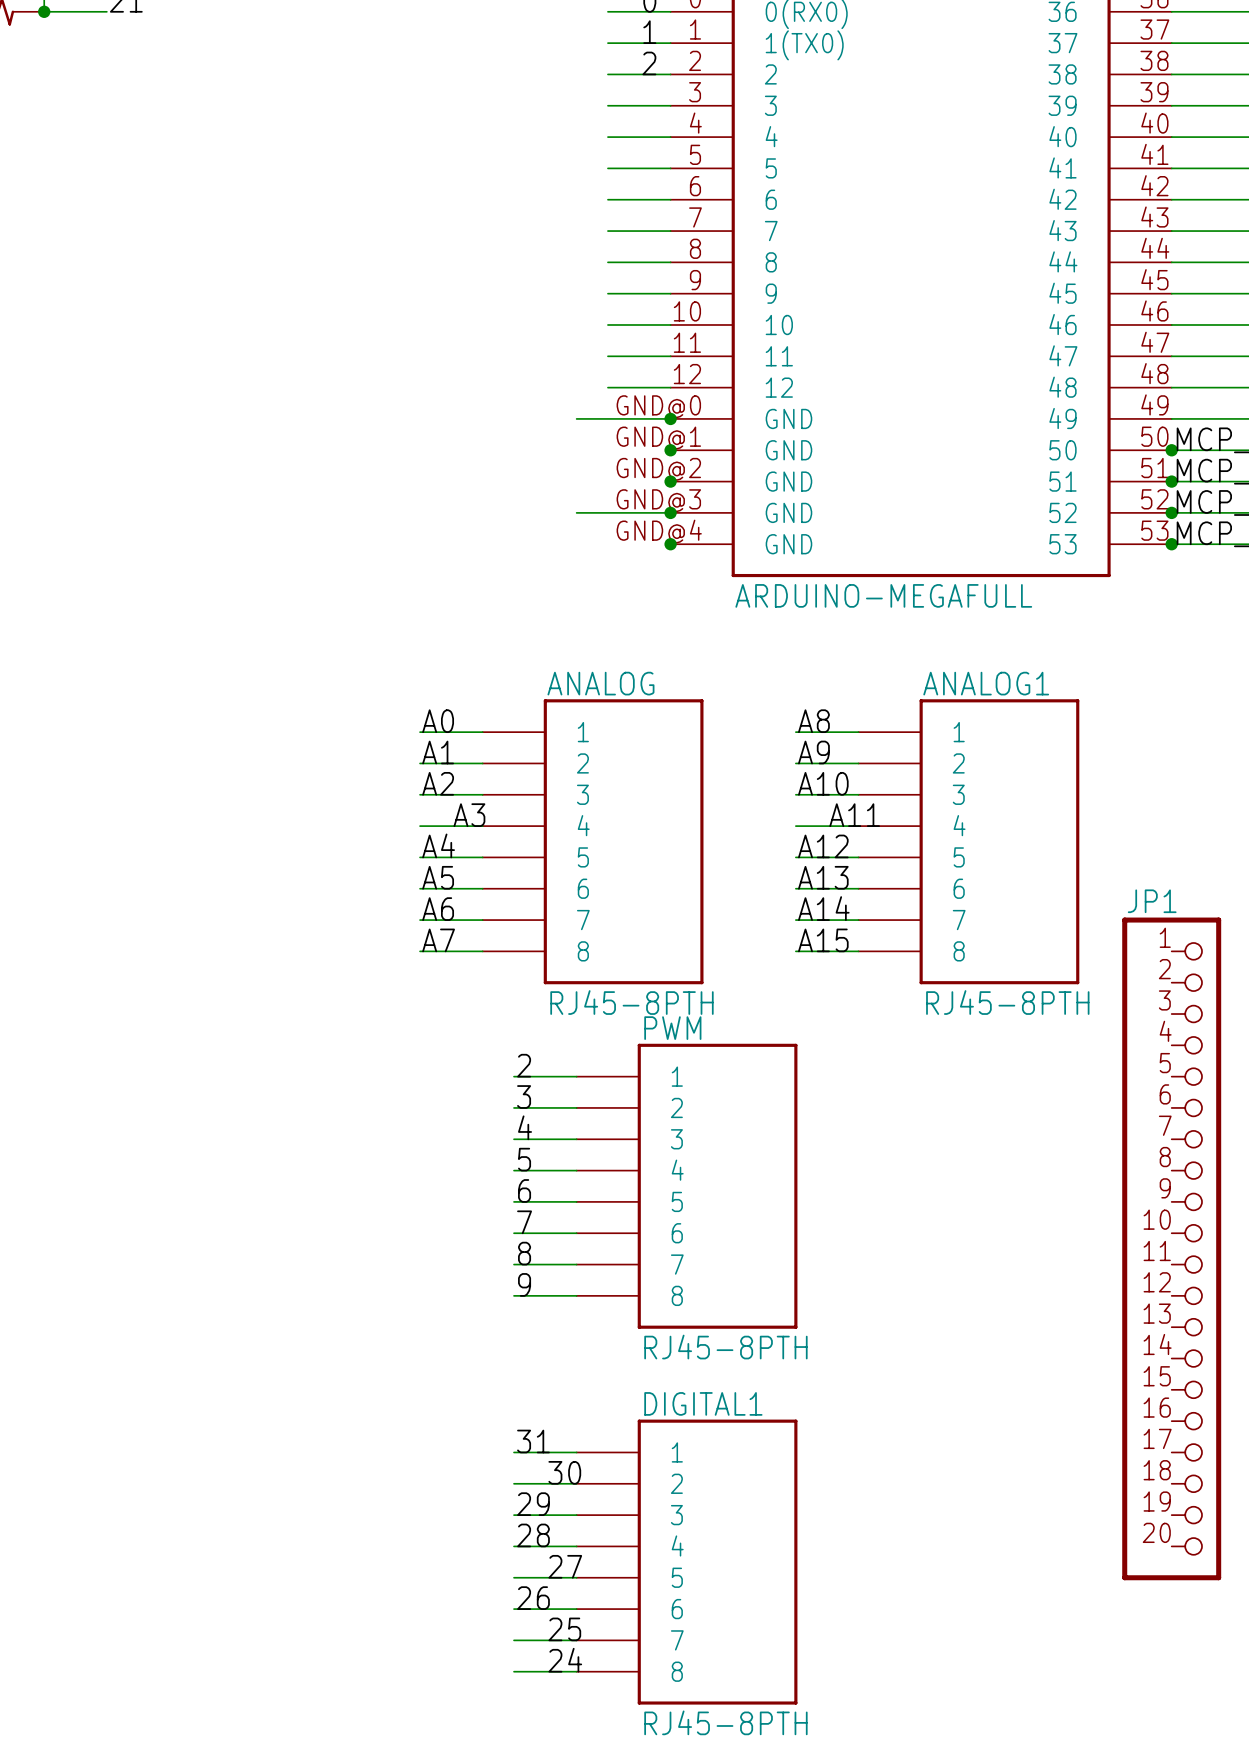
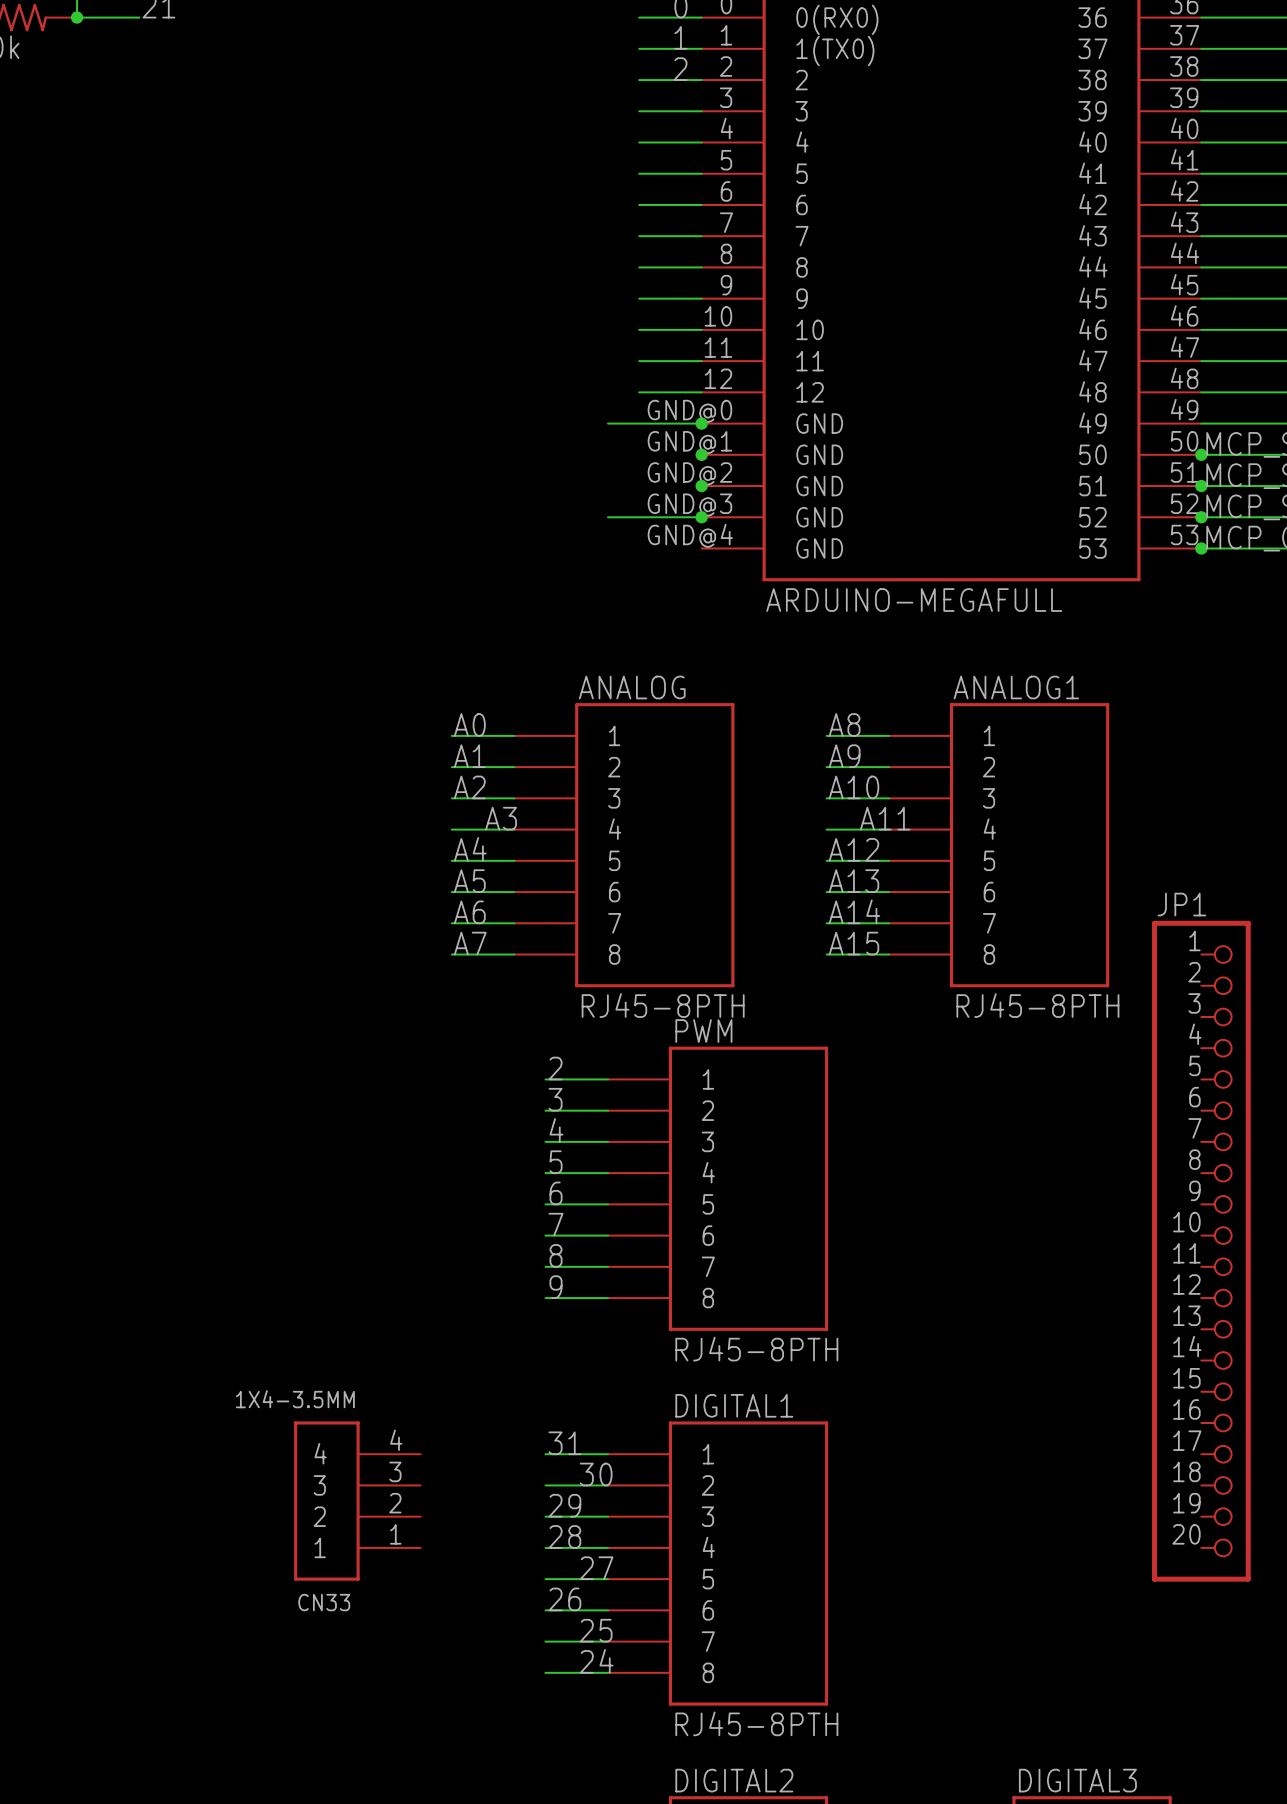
junction: (670, 544) -> none
CN33: none -> 1X4-3.5MM (357, 1501)

